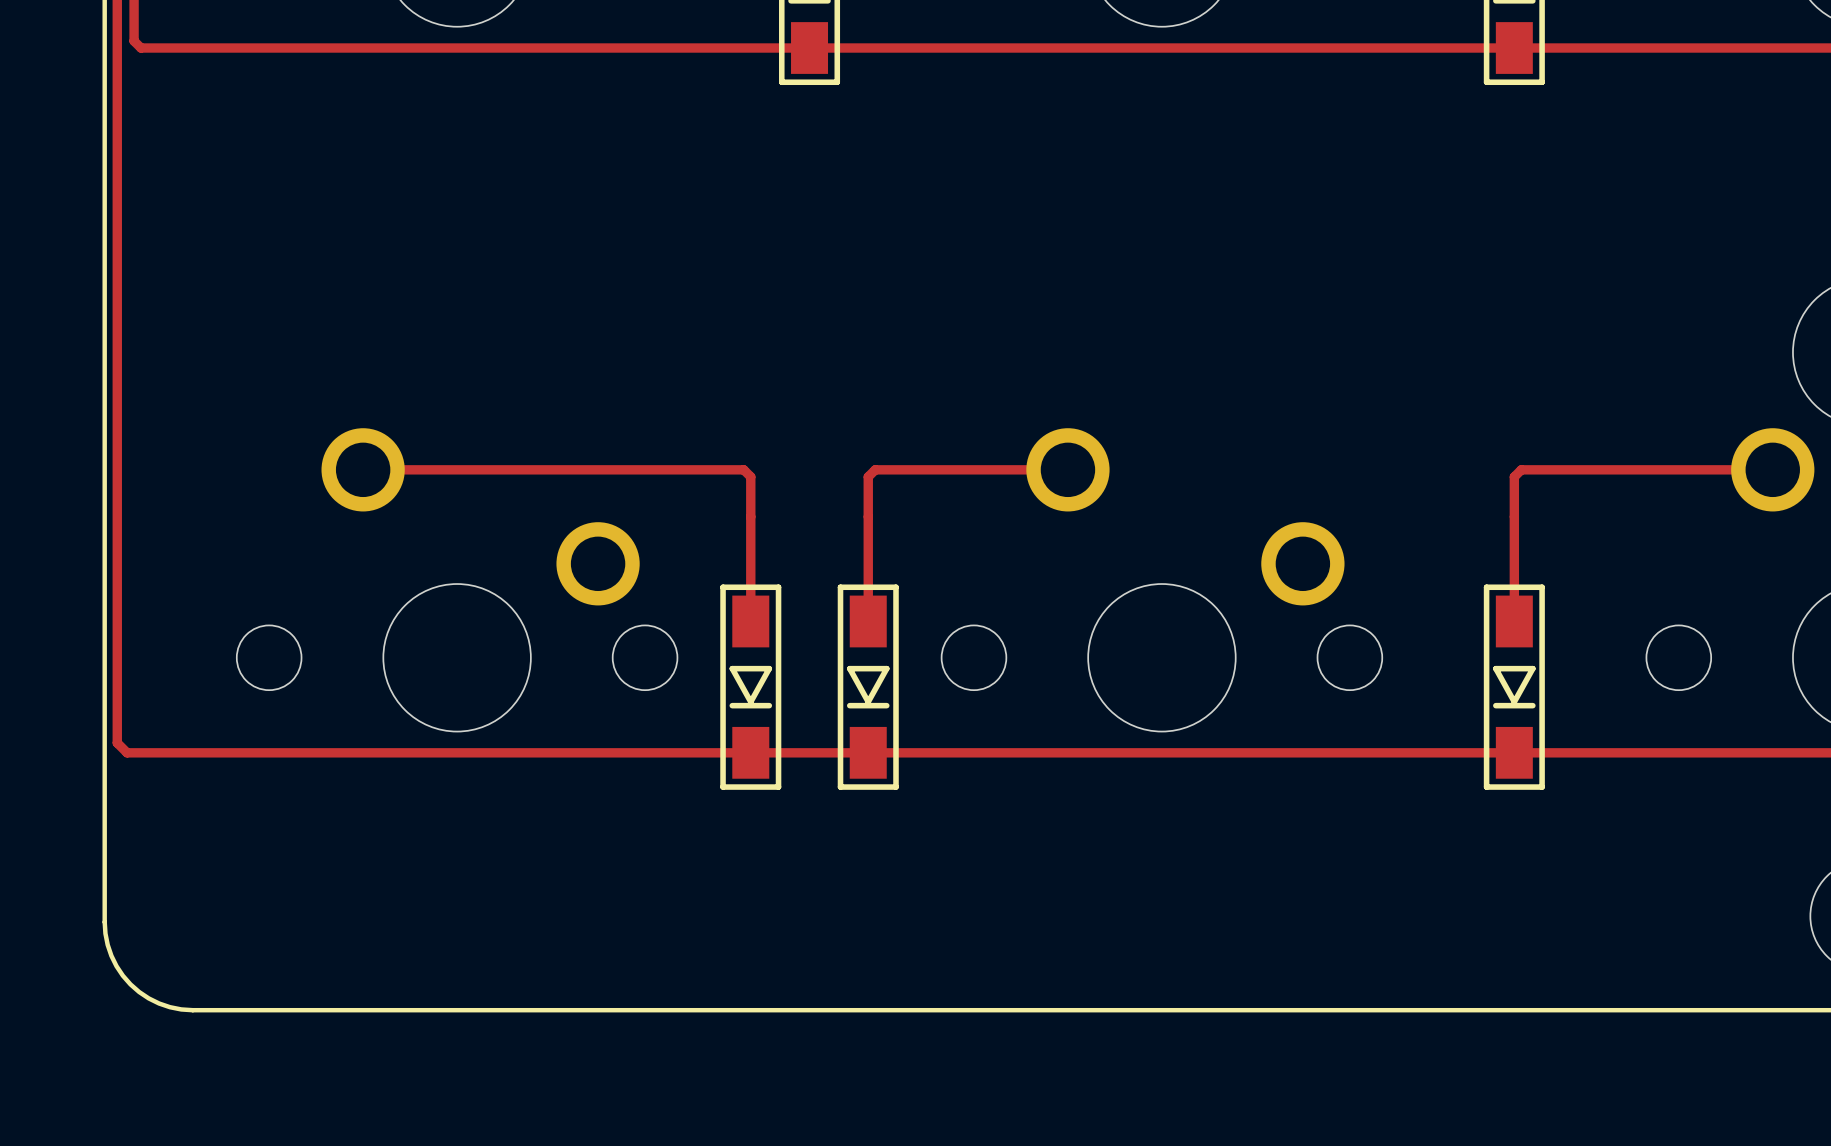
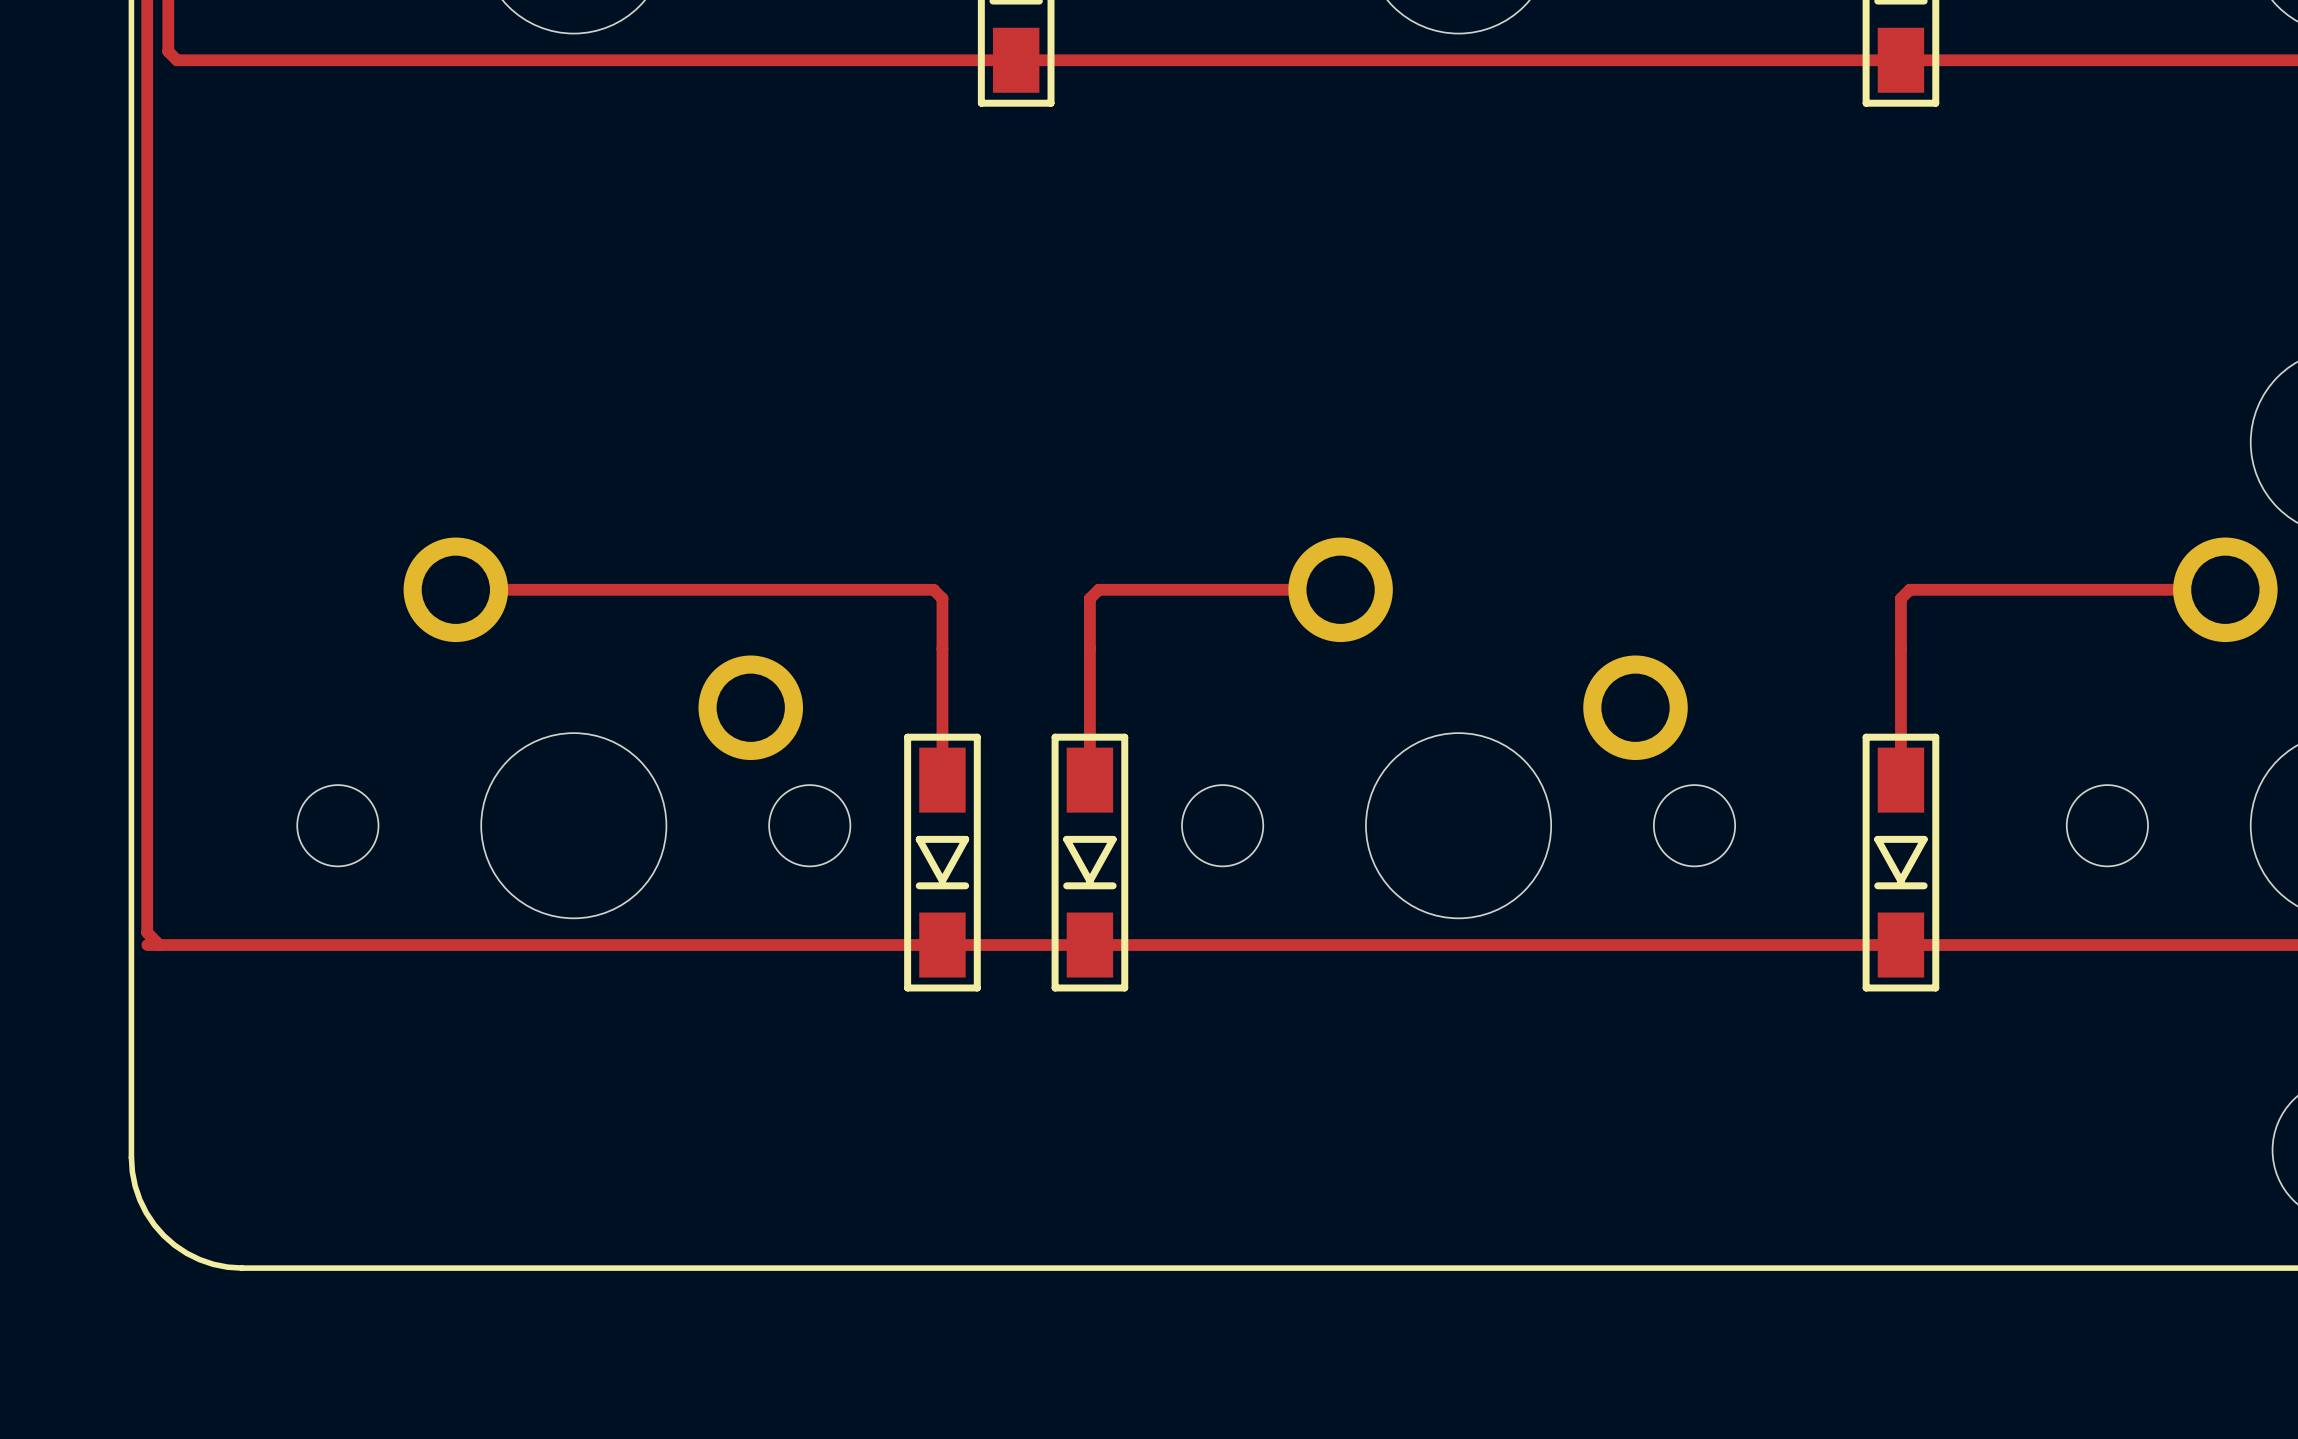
track: none -> (147, 945) (159, 945)

